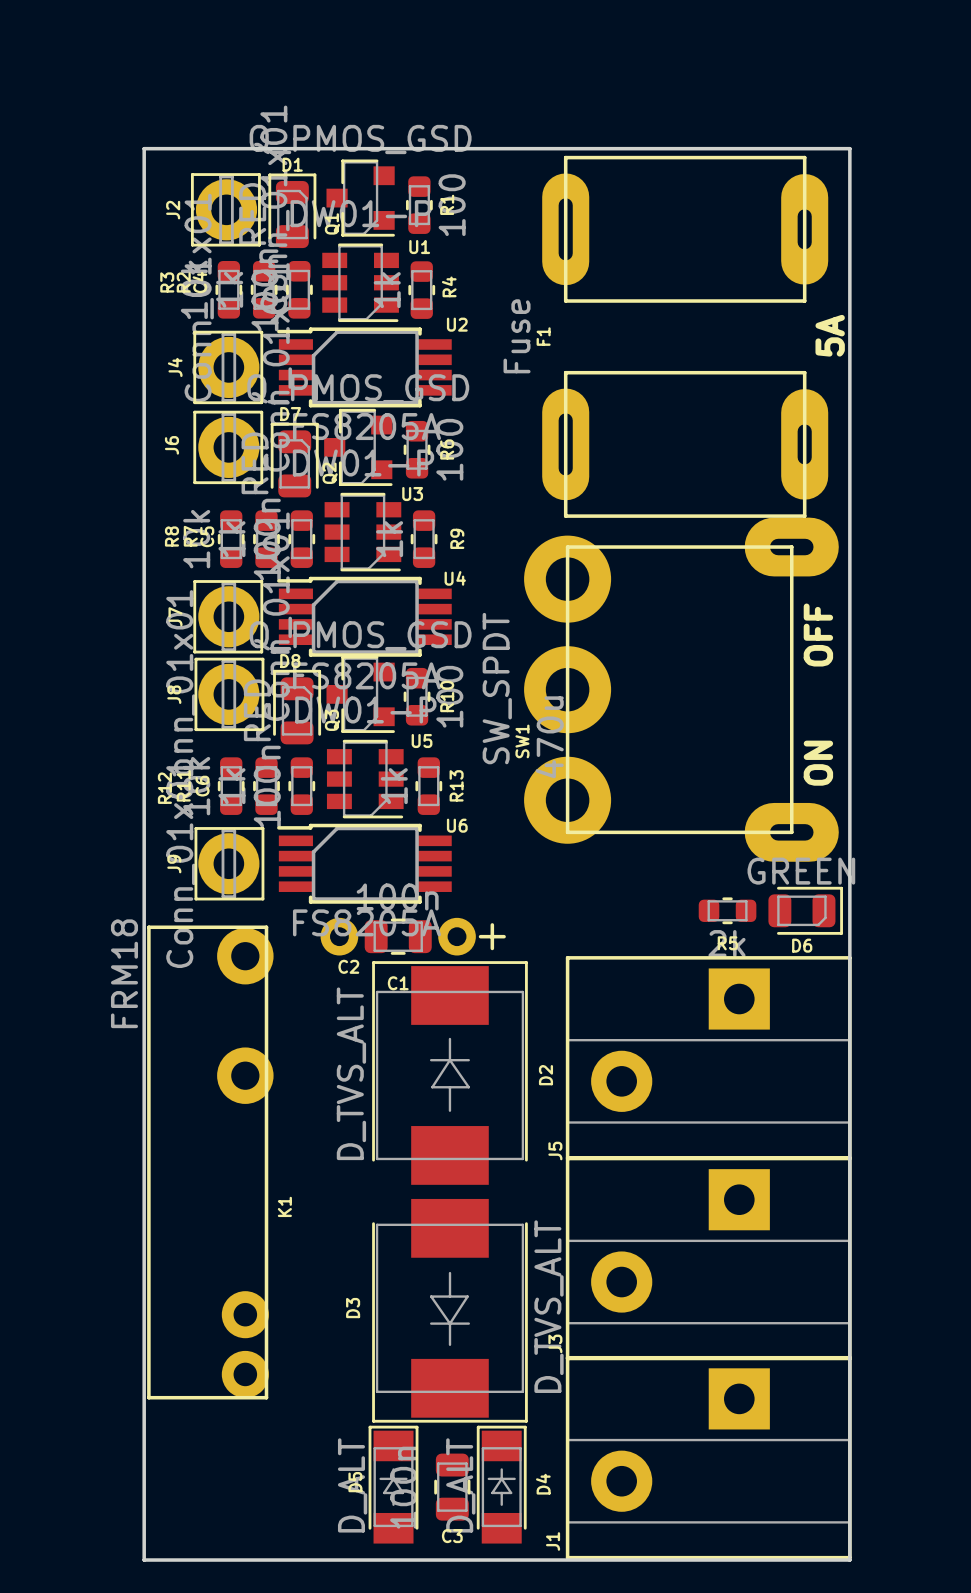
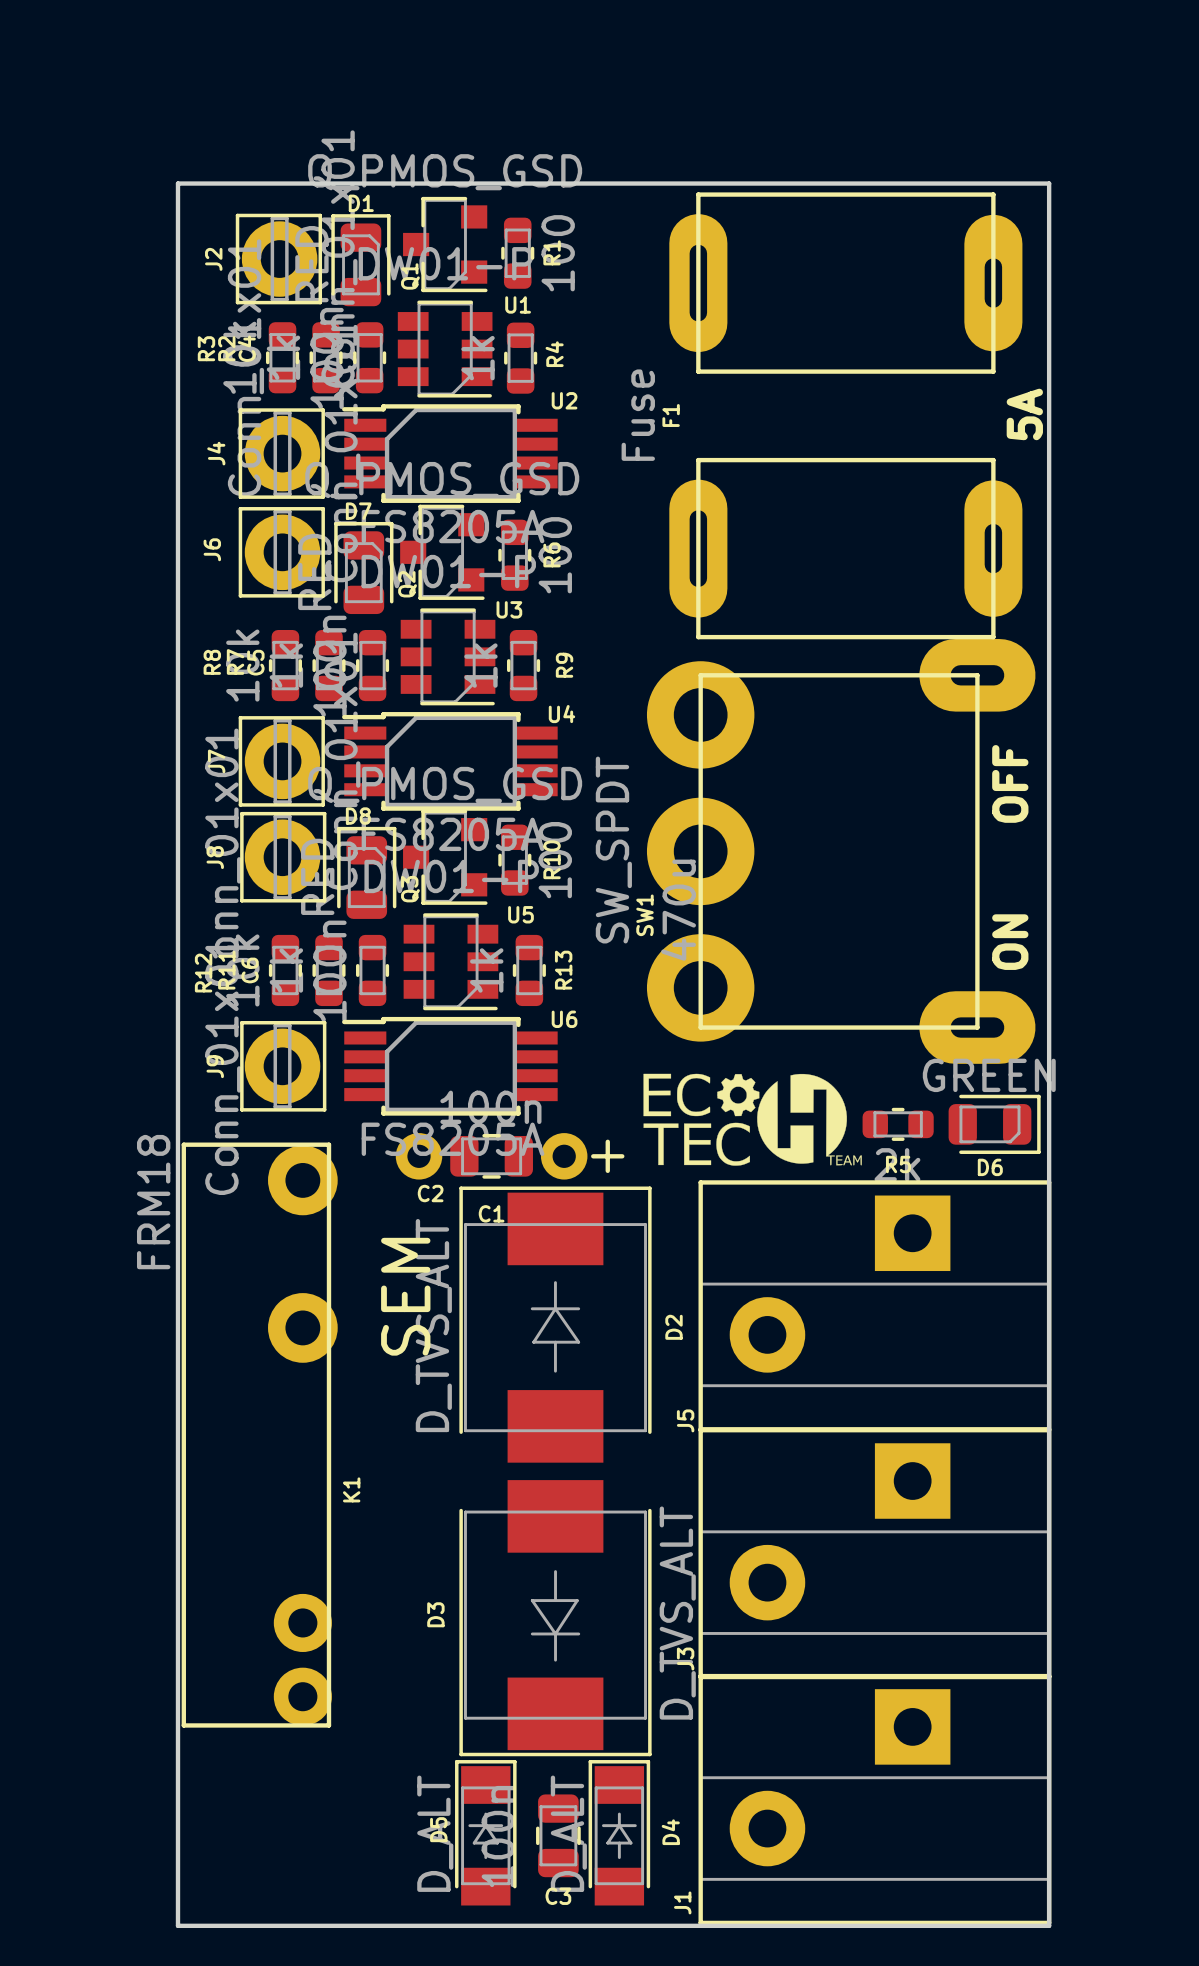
drawing: none -> [643, 1073, 862, 1166]
text: none -> SEM (405, 1296)

